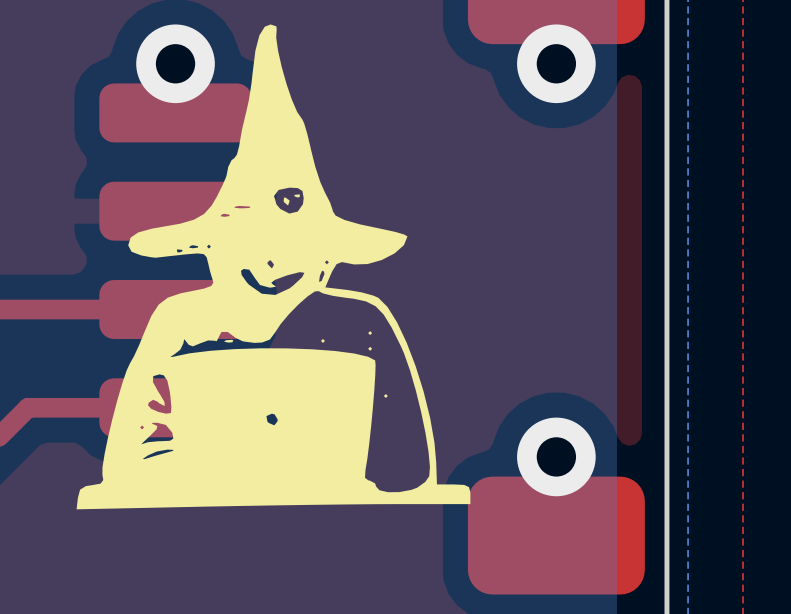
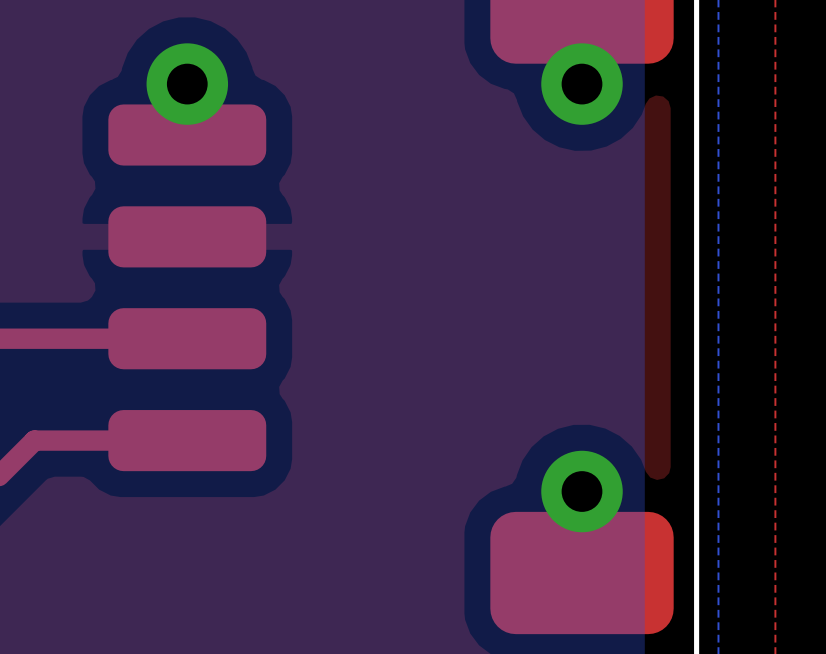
drawing: [76, 24, 471, 510] -> none

